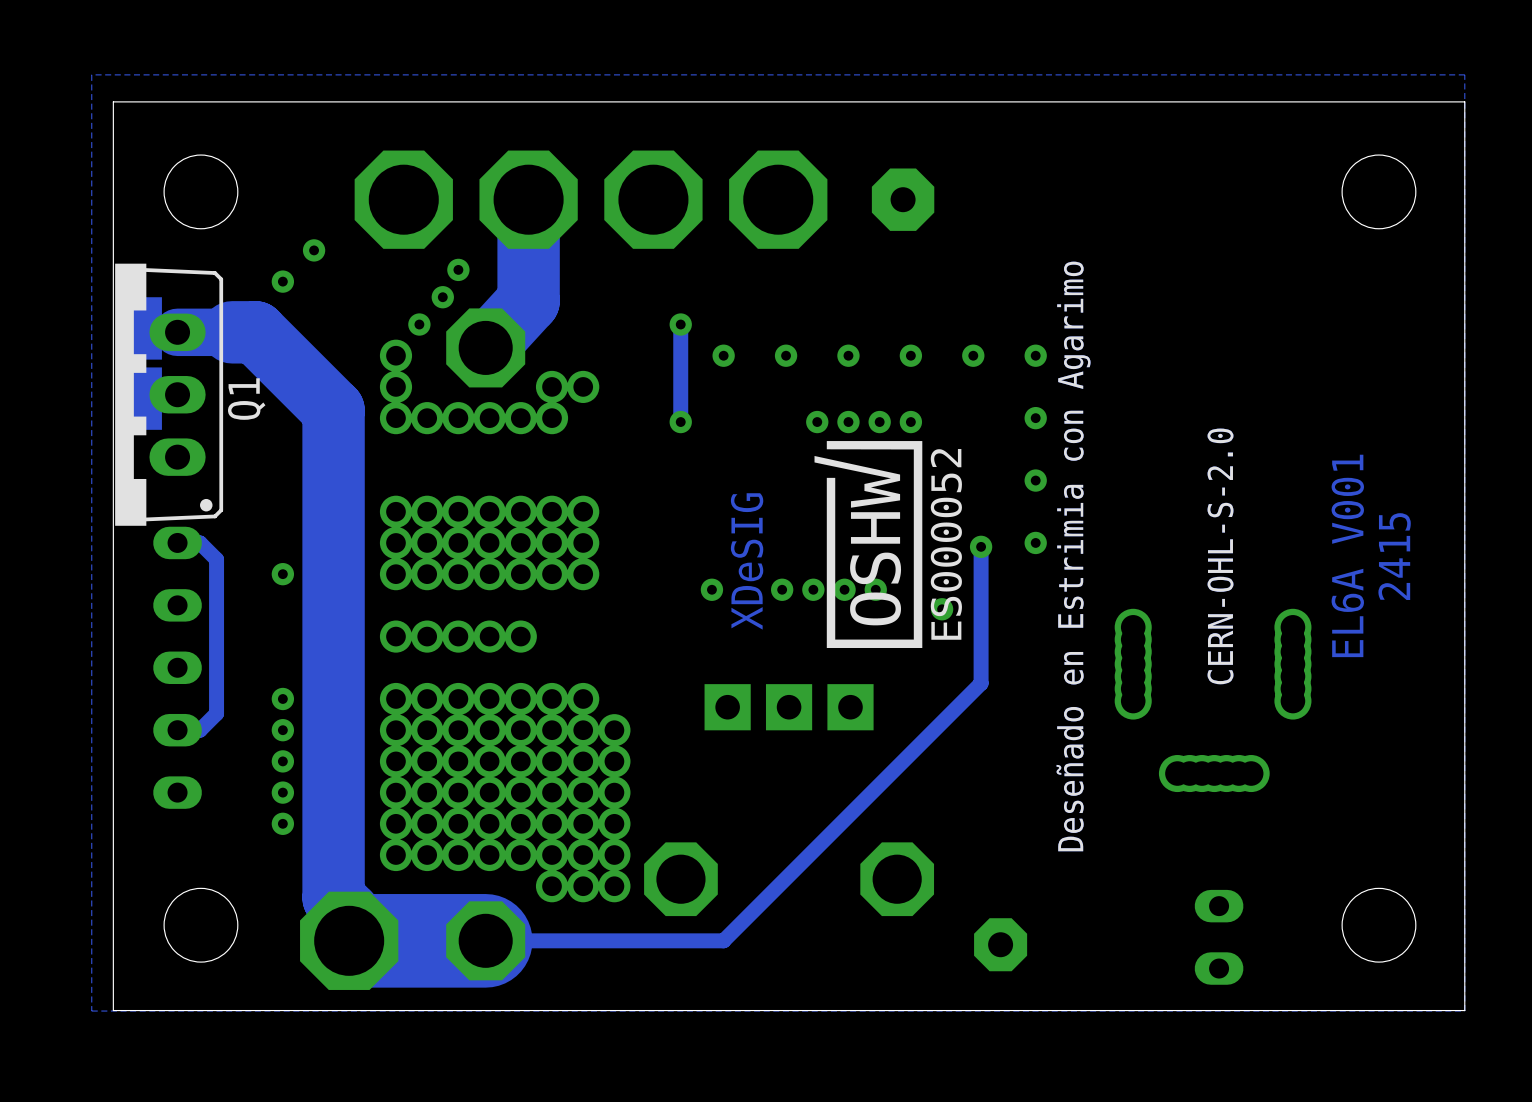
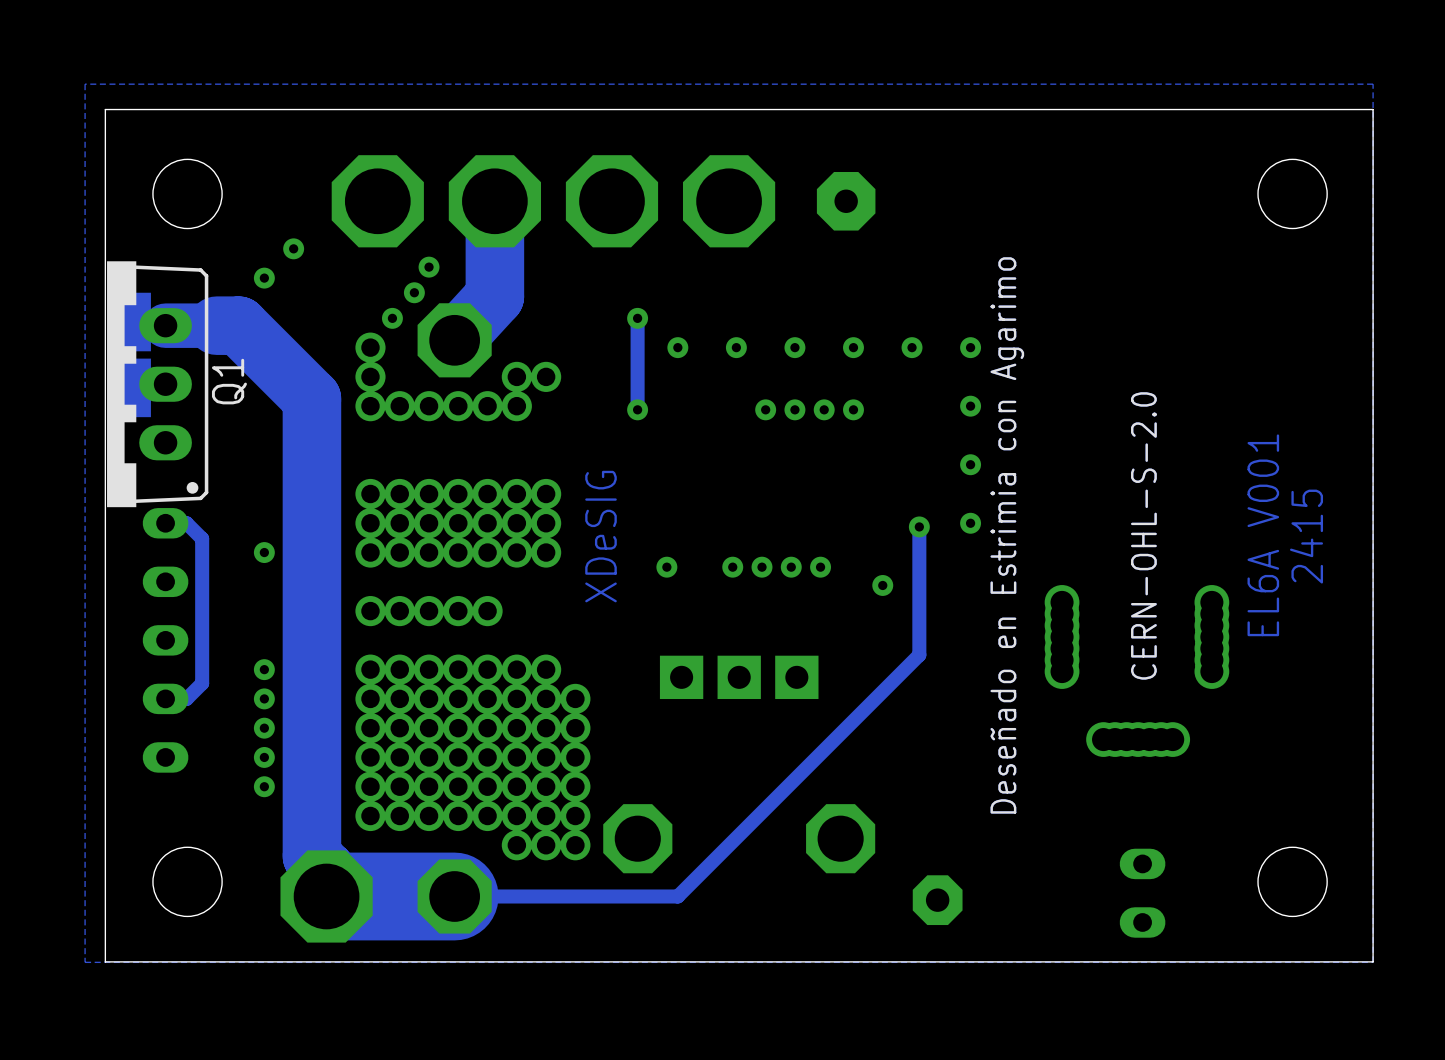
drawing: [814, 441, 962, 648] -> none
text position: XDeSIG (747, 561) -> XDeSIG (601, 536)

